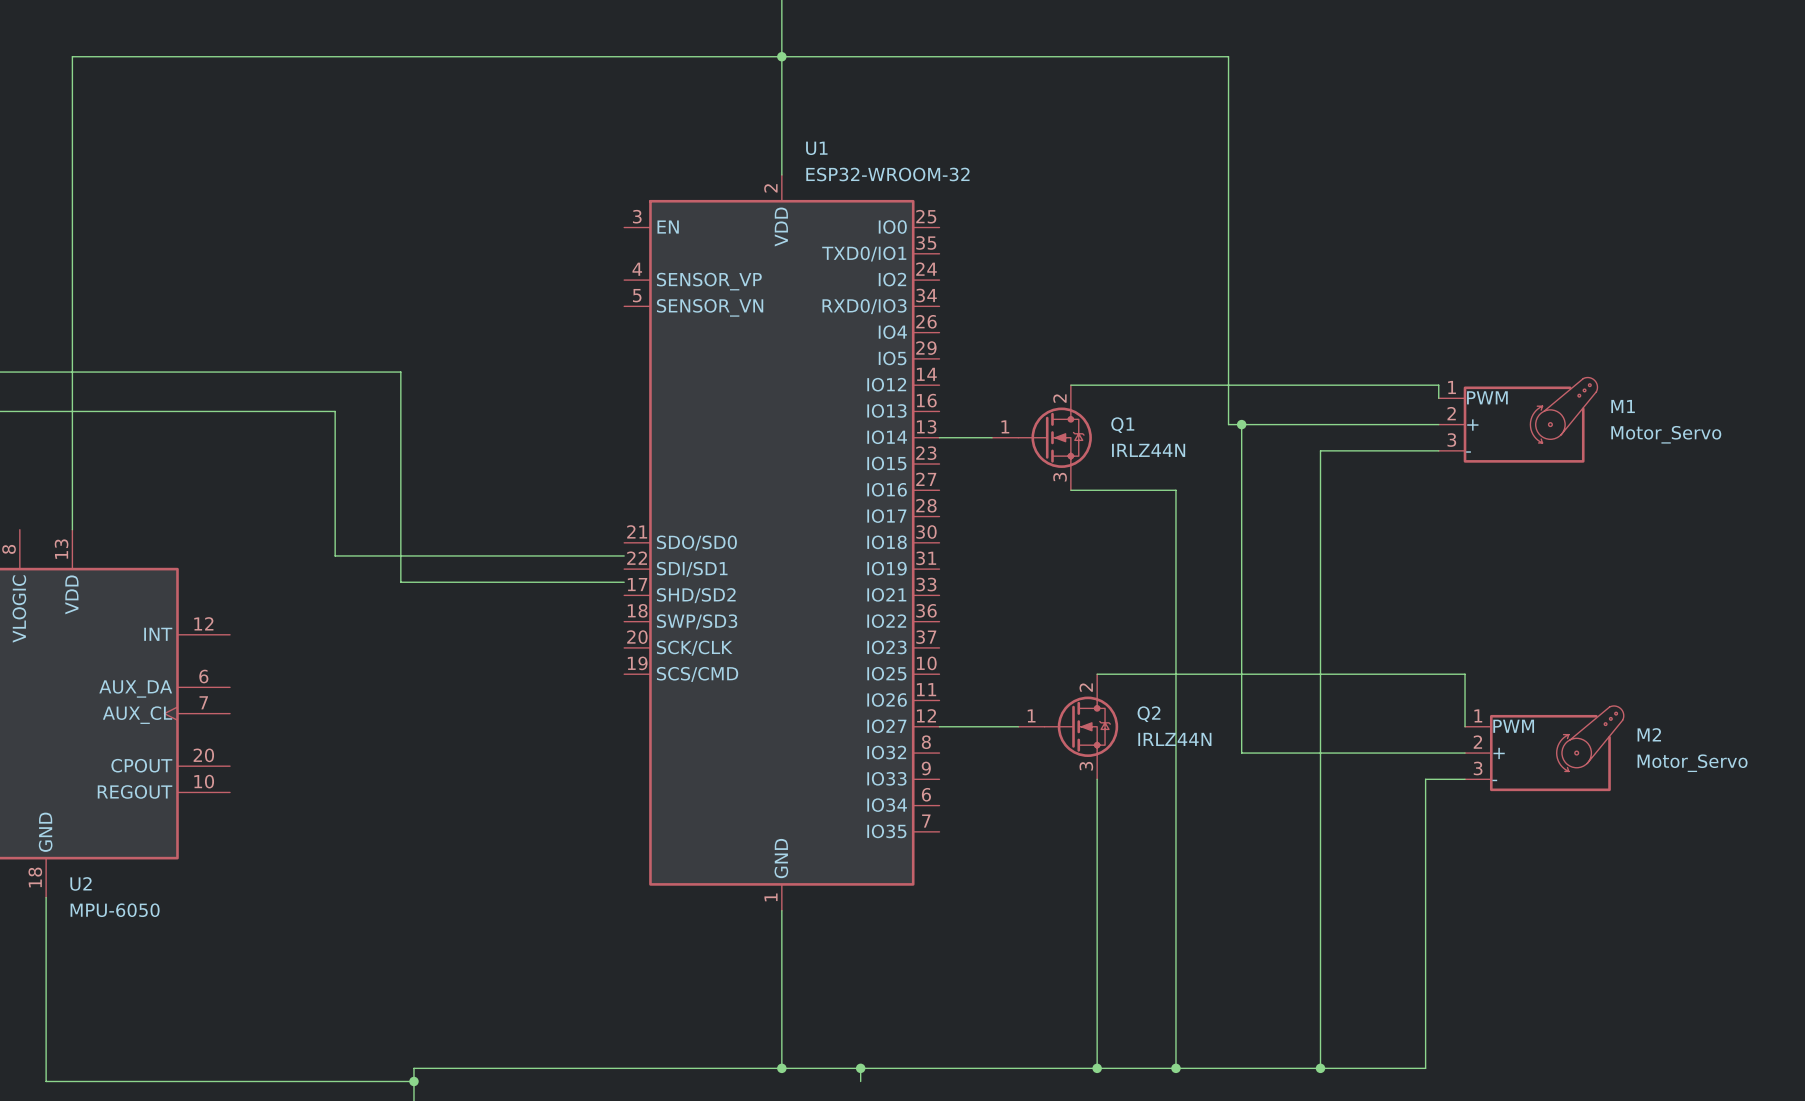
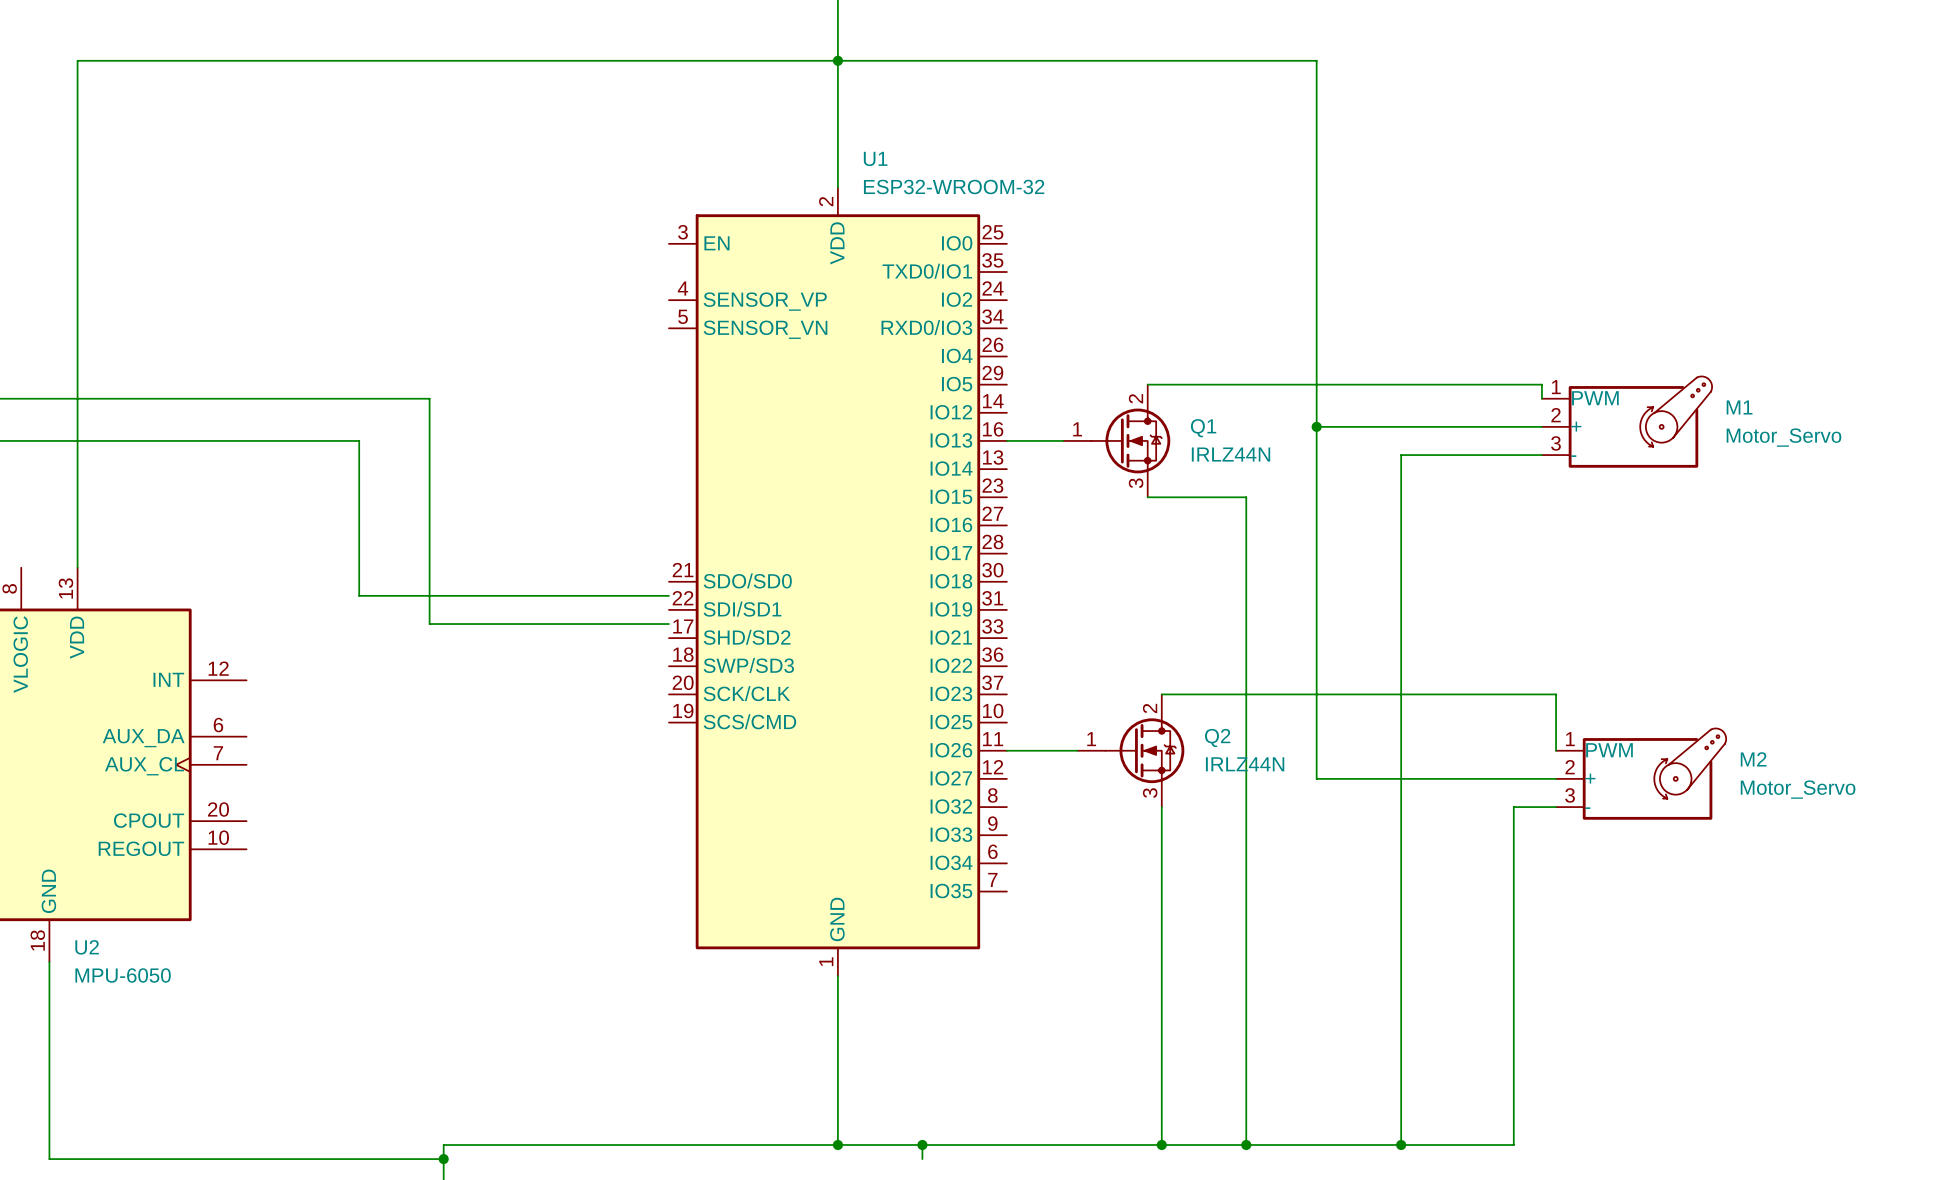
wire: none -> (1147, 384) (1541, 384) (1541, 398)
wire: (1070, 385) (1438, 385) (1438, 398) -> (1316, 426) (1541, 426)
M1 position: (1518, 420) -> (1627, 422)
wire: (1228, 424) (1307, 424) -> (1316, 455) (1316, 778) (1556, 778)
wire: (1241, 424) (1241, 753) (1412, 753) -> none
junction position: (1241, 424) -> (1316, 426)
wire: none -> (1401, 455) (1401, 1145)
wire: (939, 437) (992, 437) -> (1006, 440) (1063, 440)
Q1 position: (1041, 437) -> (1116, 440)
wire: (1438, 450) (1320, 450) (1320, 1068) -> none
wire: none -> (1147, 497) (1246, 497) (1246, 1145)
wire: (1070, 490) (1175, 490) (1175, 1068) -> none
wire: (1097, 674) (1465, 674) (1465, 726) -> (1161, 694) (1556, 694) (1556, 750)
wire: none -> (1006, 750) (1077, 750)
wire: (939, 726) (1018, 726) -> none
Q2 position: (1068, 726) -> (1130, 750)
M2 position: (1544, 748) -> (1641, 774)
wire: none -> (1161, 807) (1161, 1145)
wire: (1097, 779) (1097, 1068) -> none
wire: (1465, 779) (1425, 779) (1425, 1068) (1412, 1068) -> (1513, 807) (1513, 1145)
junction position: (1097, 1068) -> (1161, 1145)
junction position: (1175, 1068) -> (1246, 1145)
junction position: (1320, 1068) -> (1401, 1145)

